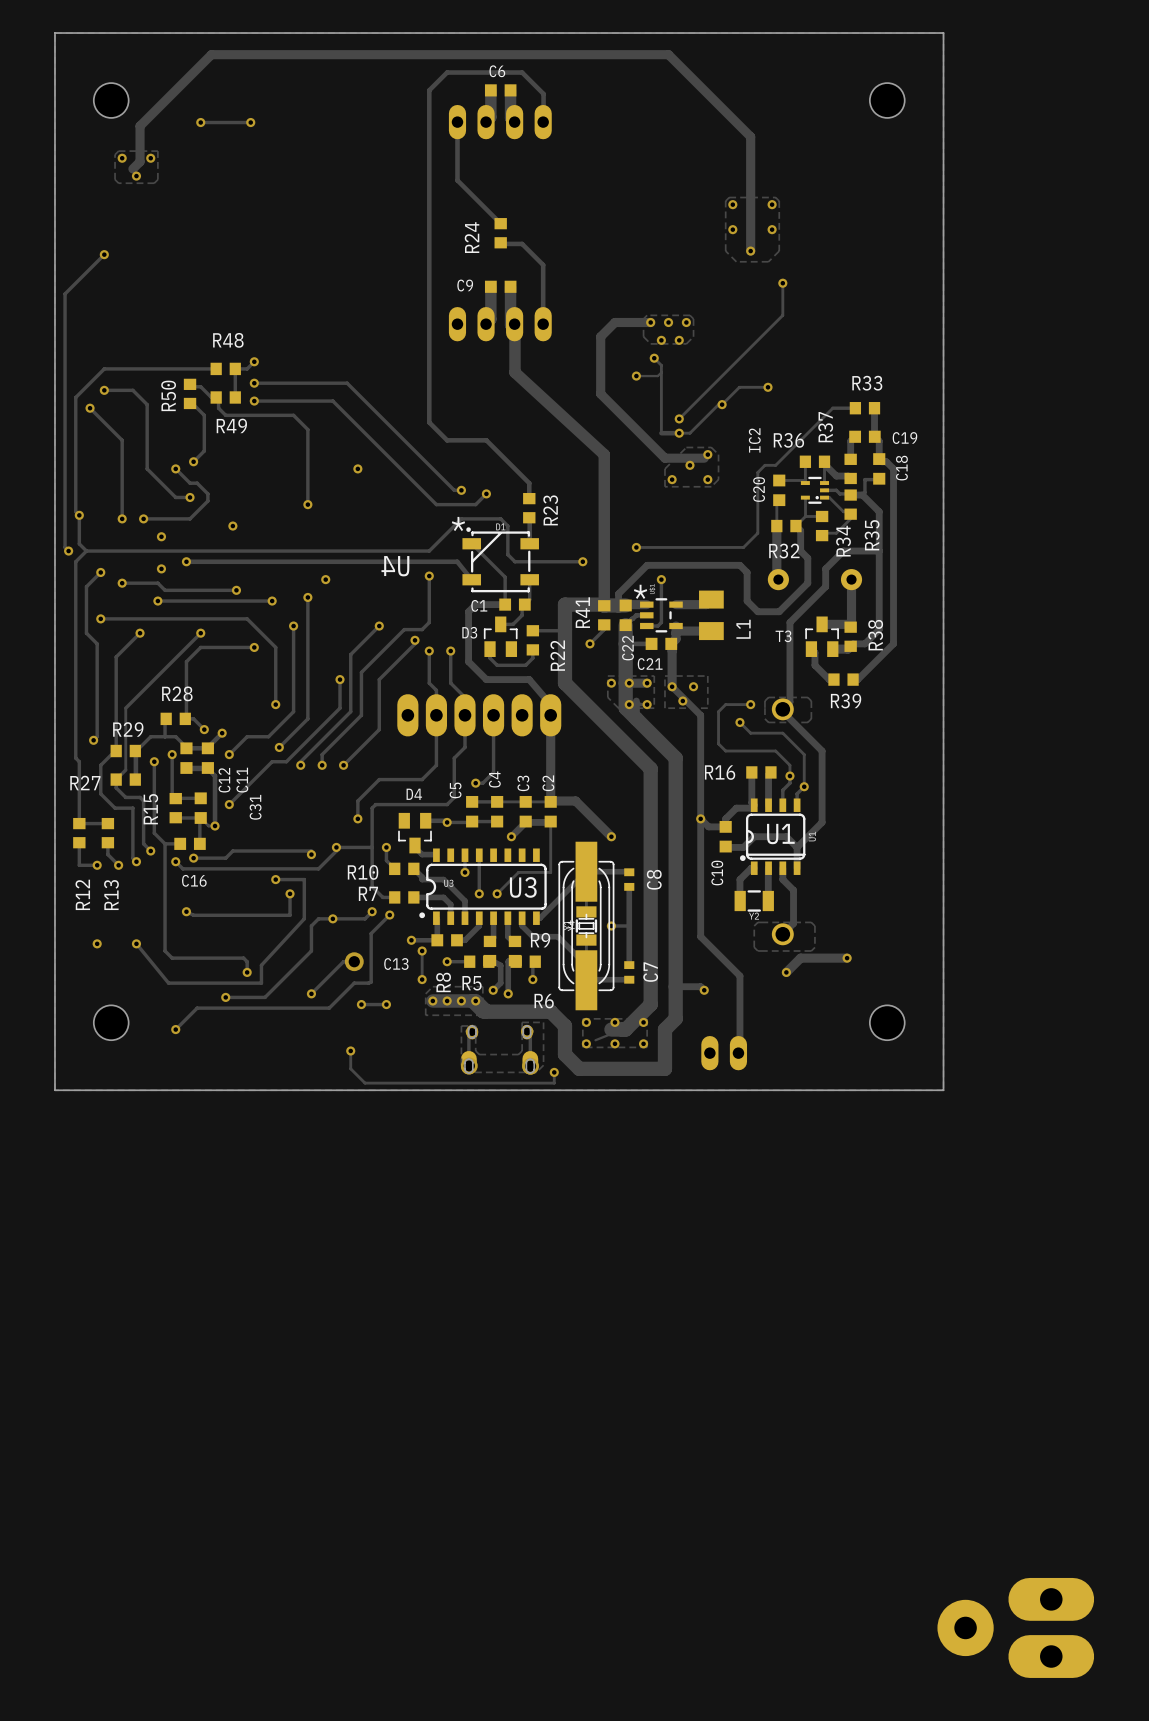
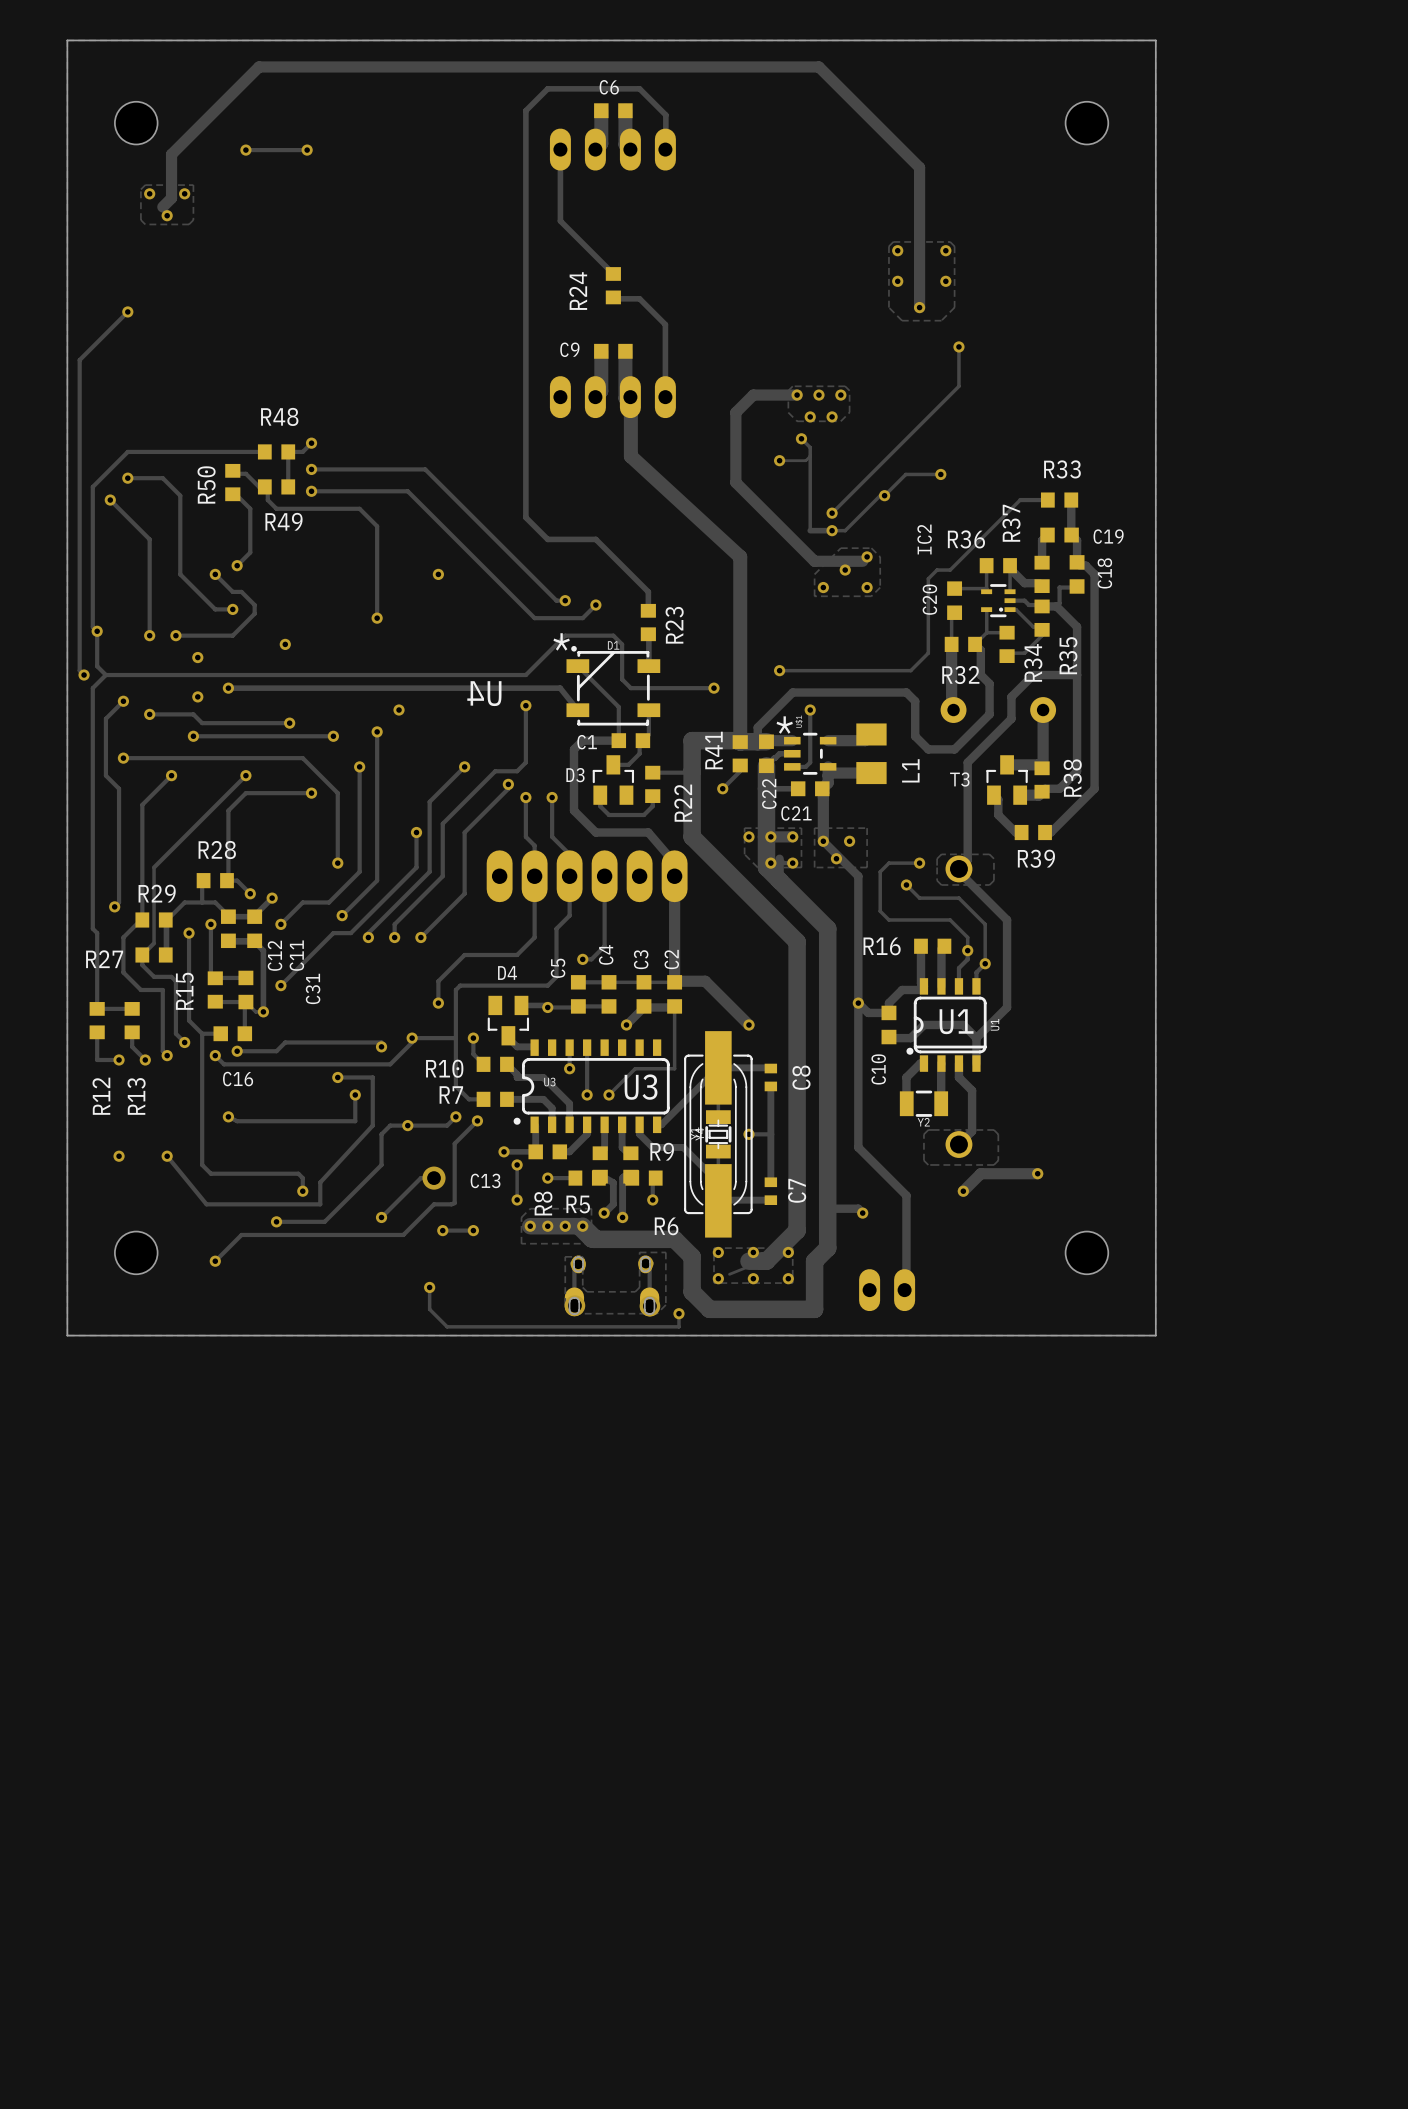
part: (1015, 1627) -> none

